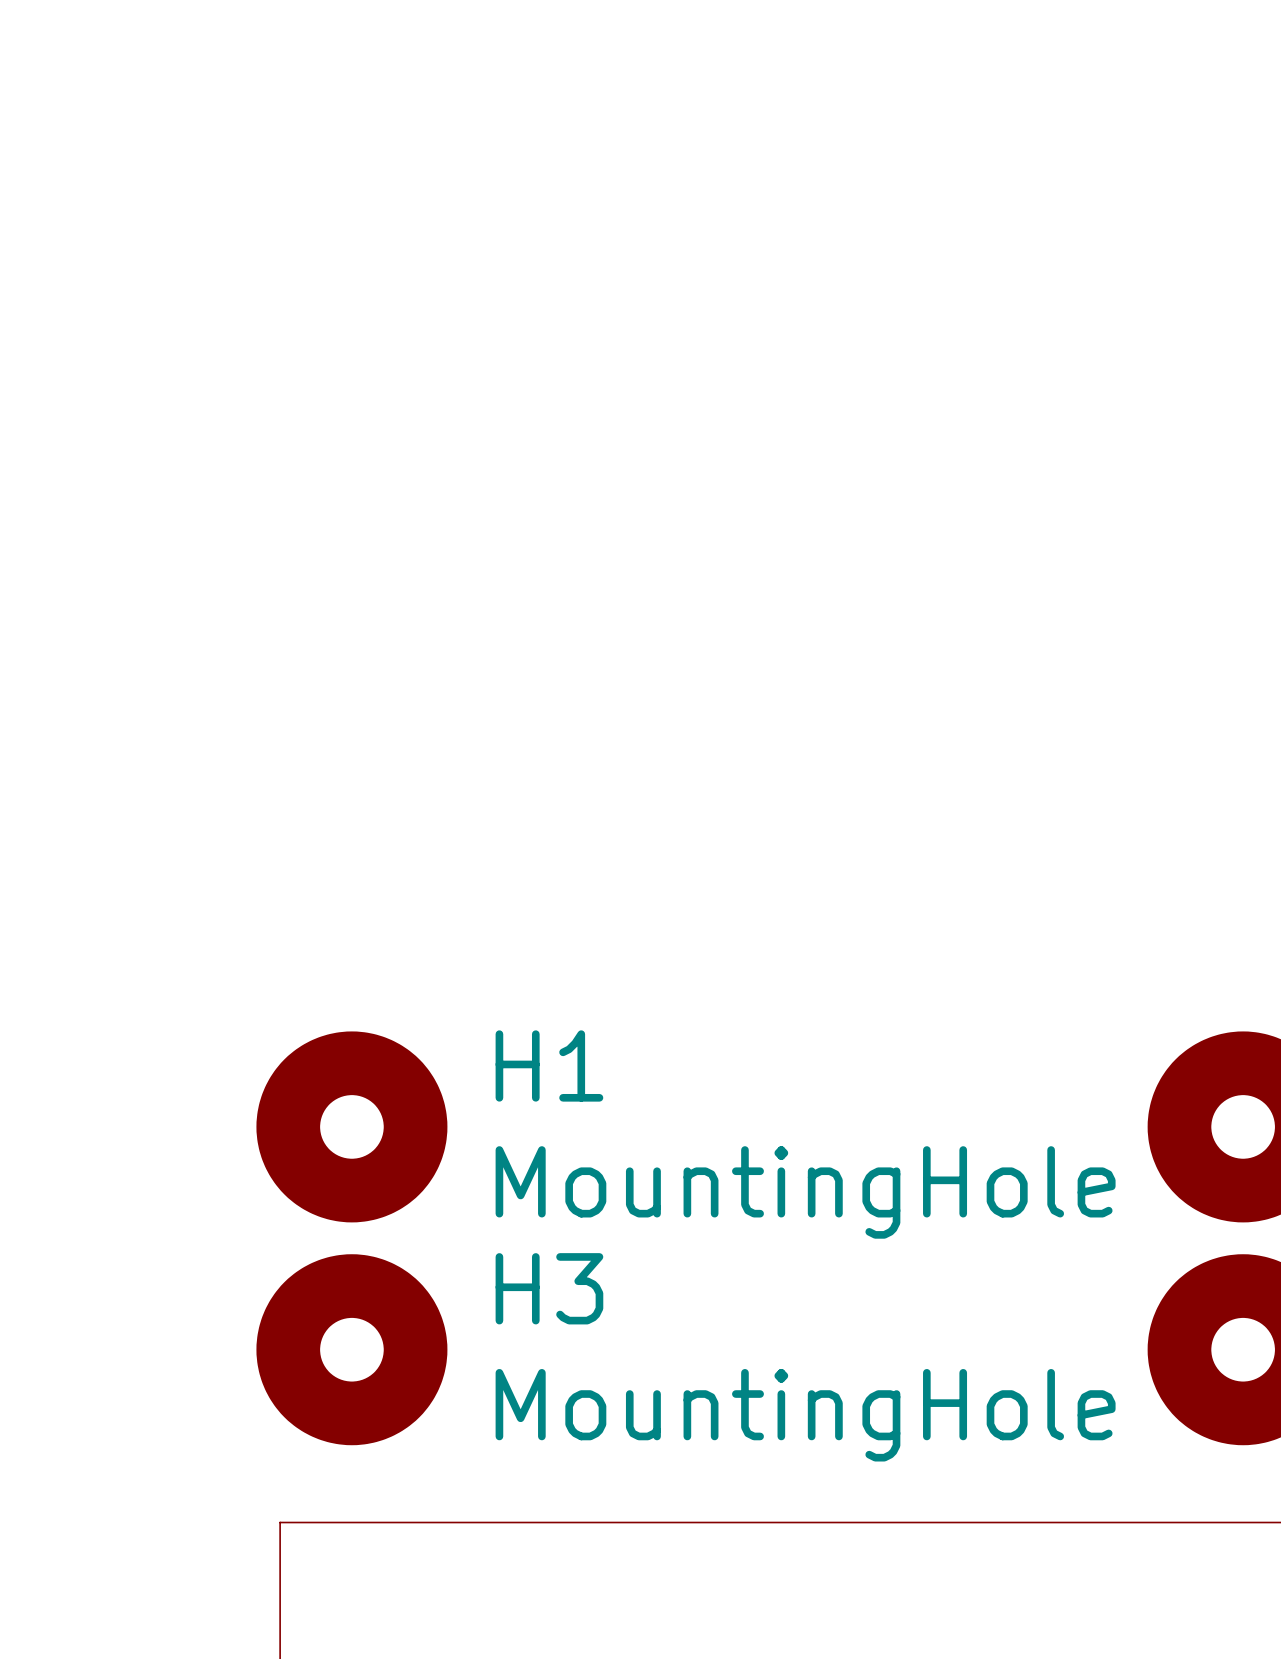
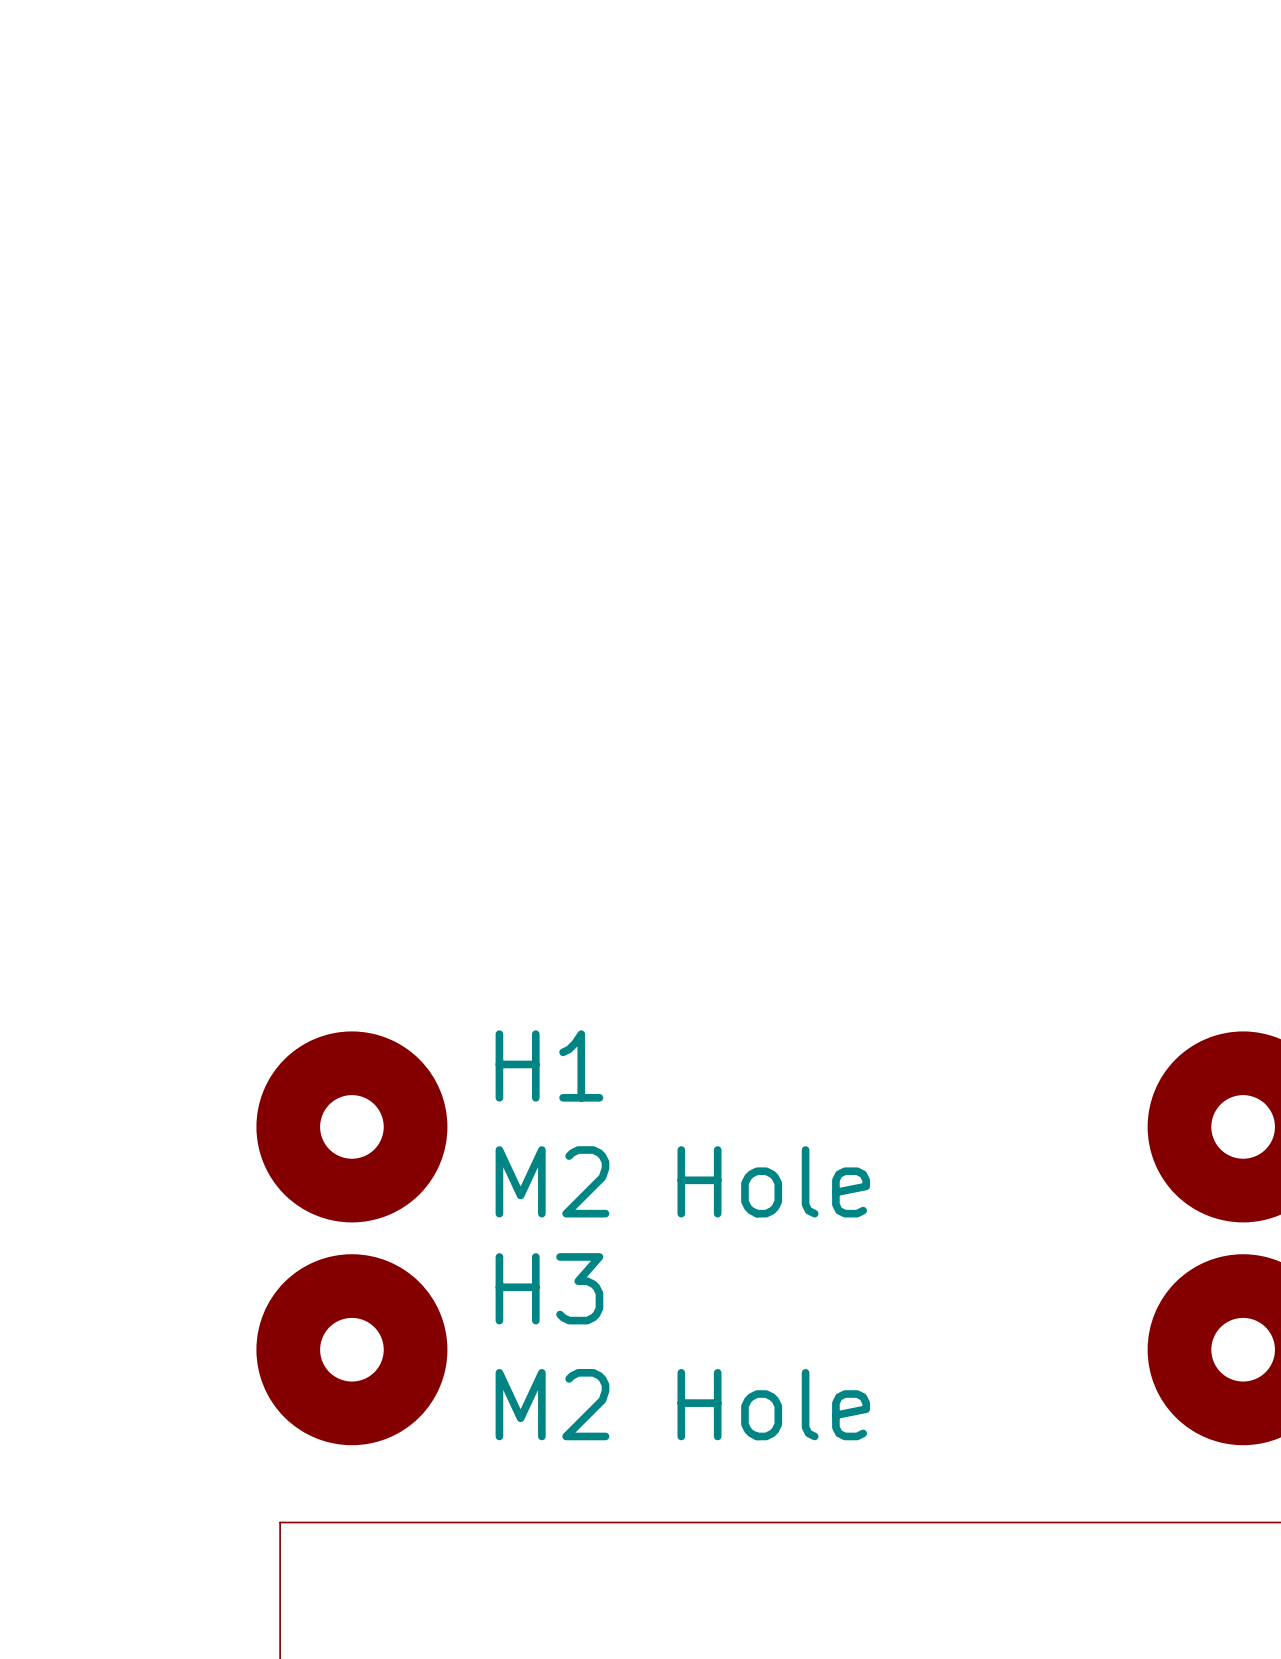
H1 value: MountingHole (805, 1192) -> M2 Hole (682, 1181)
H3 value: MountingHole (805, 1415) -> M2 Hole (682, 1404)

